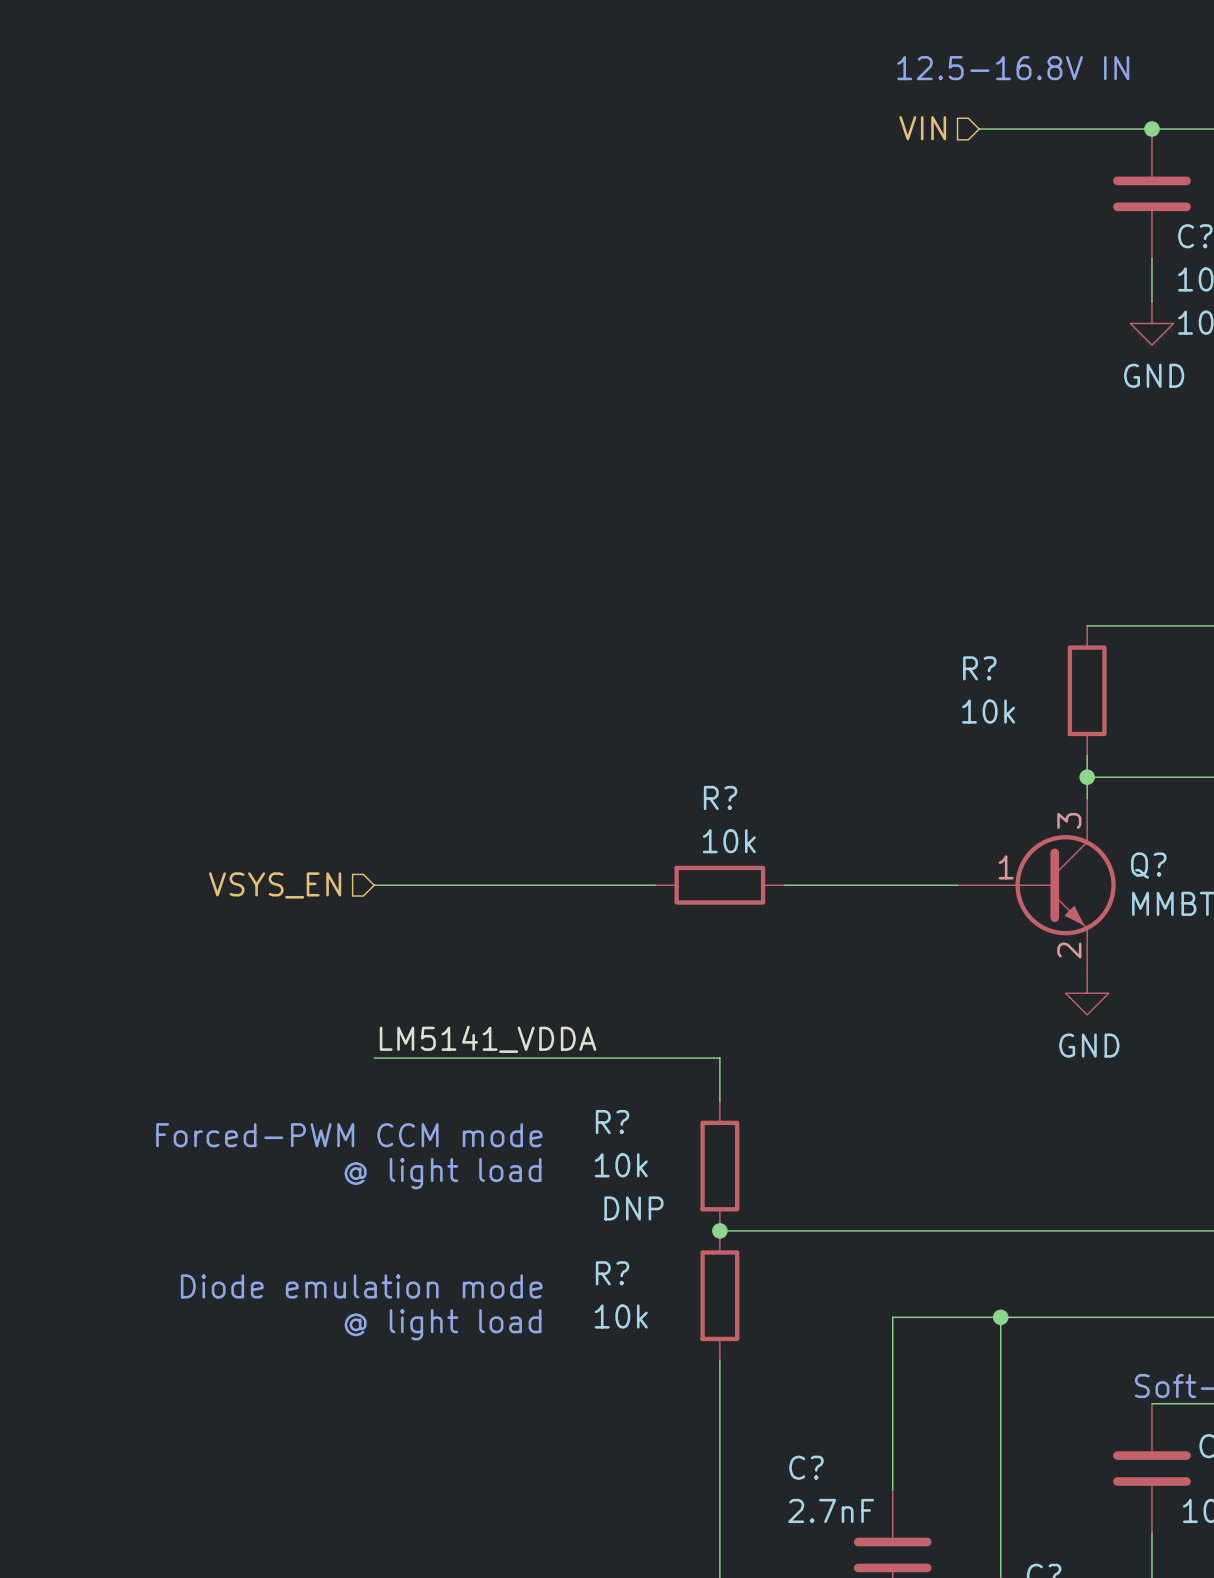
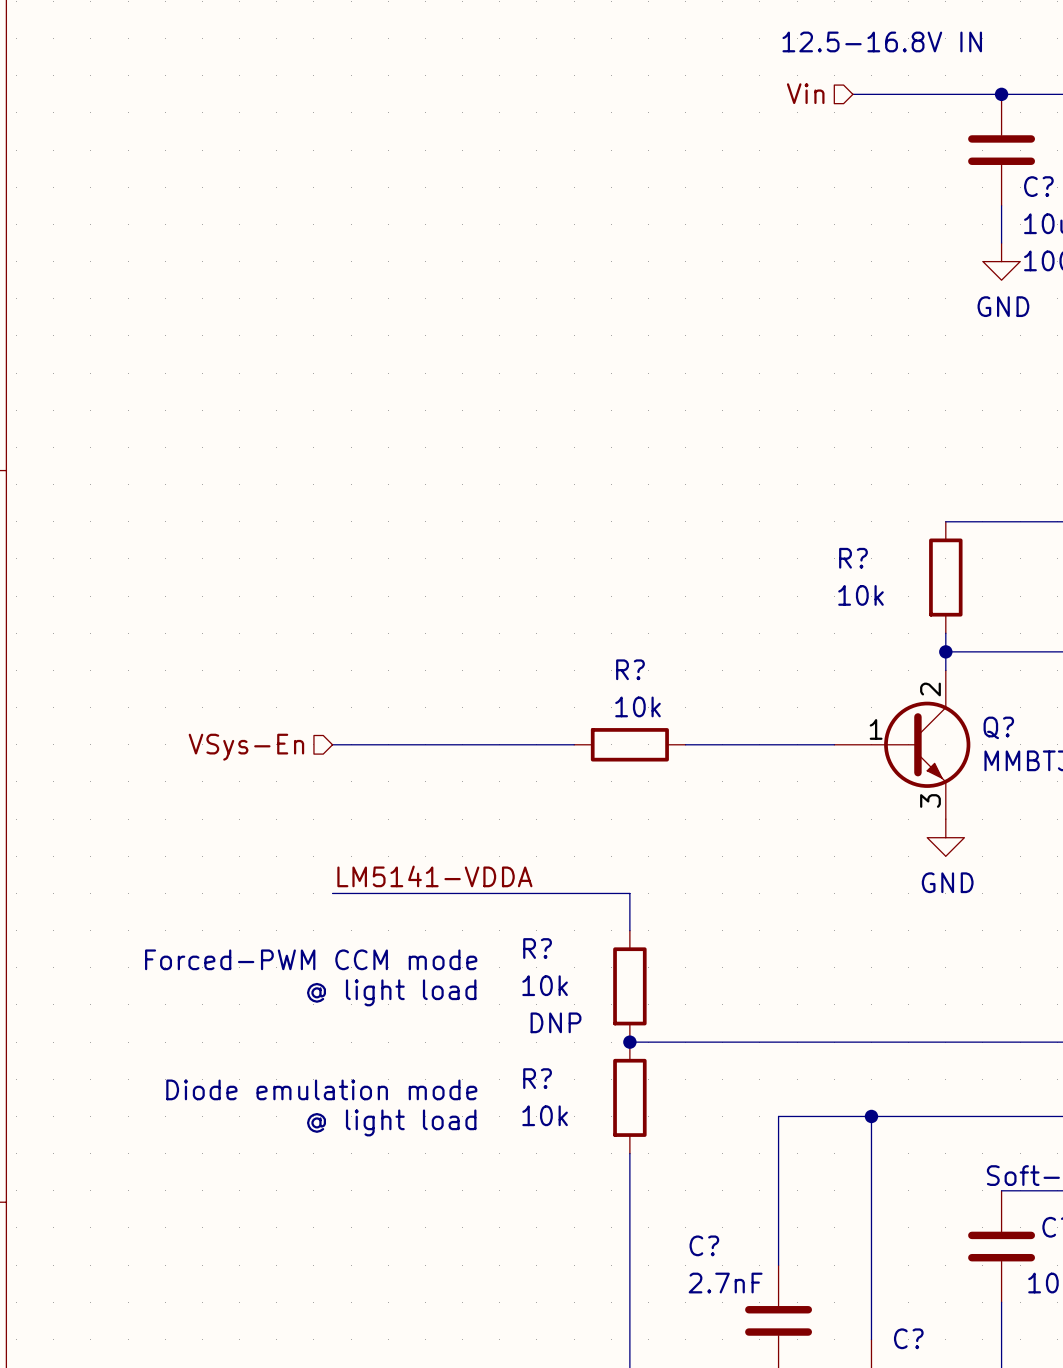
hierarchical label: VIN (922, 128) -> Vin (805, 93)
Q? pin number: 3 (1069, 820) -> 2 (930, 689)
hierarchical label: VSYS_EN (275, 885) -> VSys-En (246, 747)
Q? pin number: 2 (1069, 950) -> 3 (930, 800)
label: LM5141_VDDA (488, 1039) -> LM5141-VDDA (434, 876)

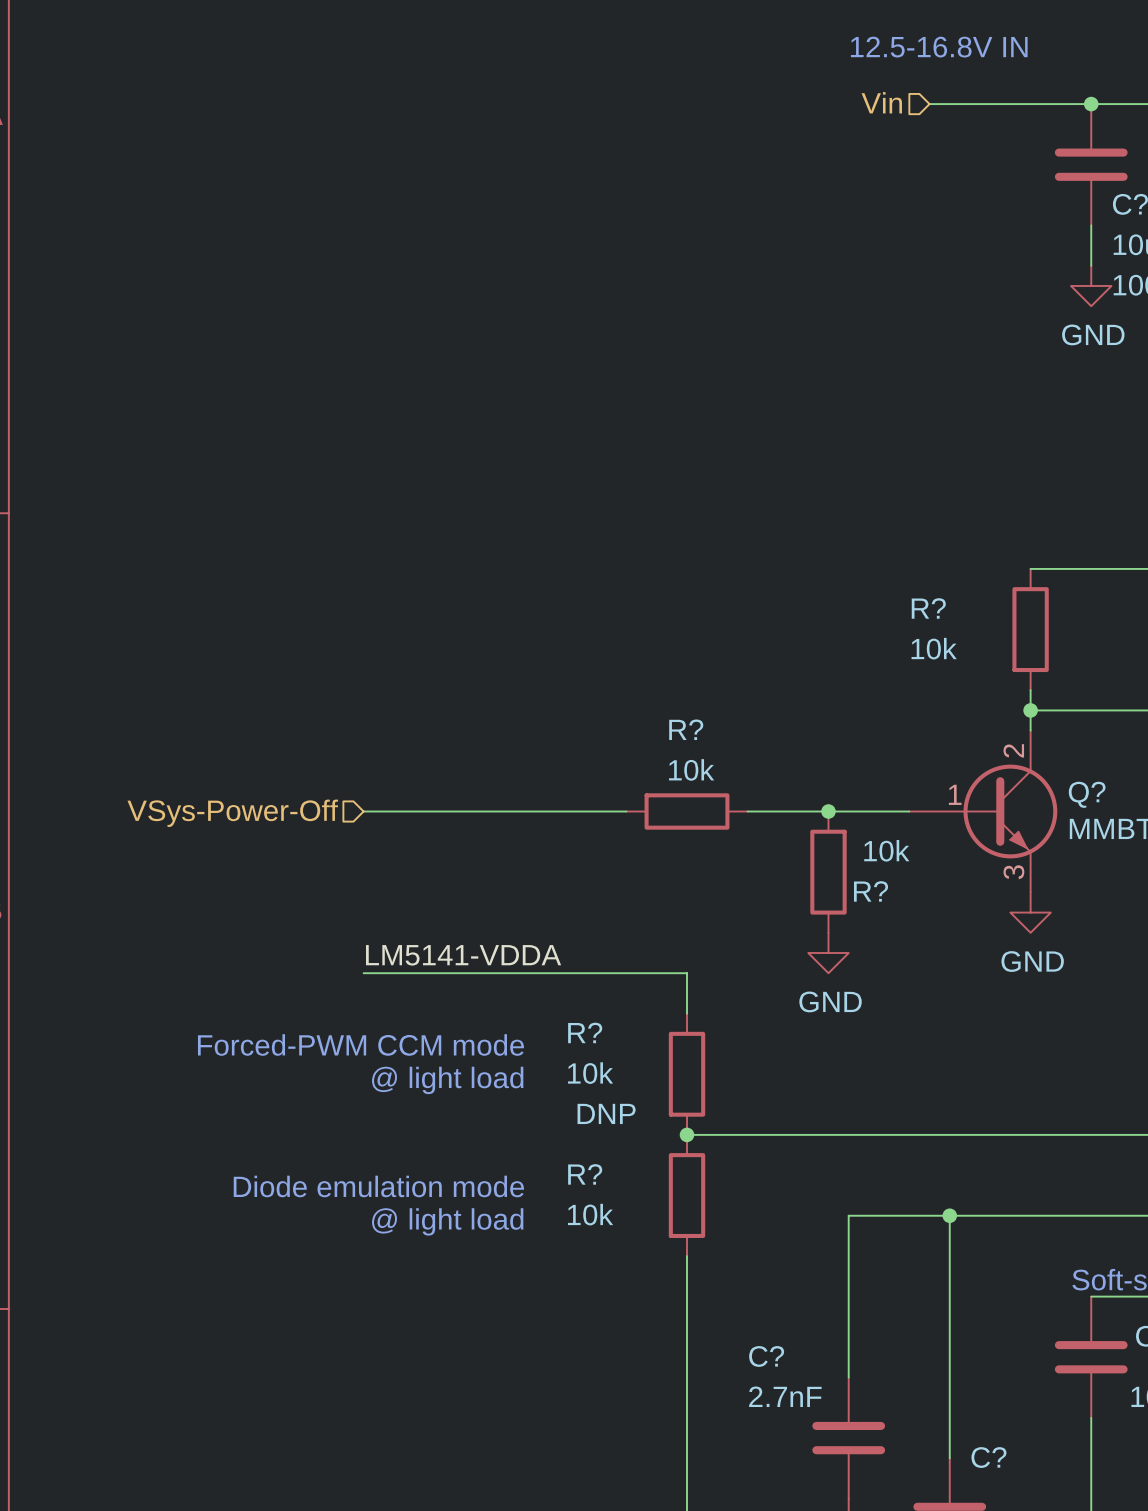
junction: none -> (828, 811)
hierarchical label: VSys-En (246, 747) -> VSys-Power-Off (232, 813)
R?: none -> 10k (828, 872)
power symbol: none -> GND (828, 952)

